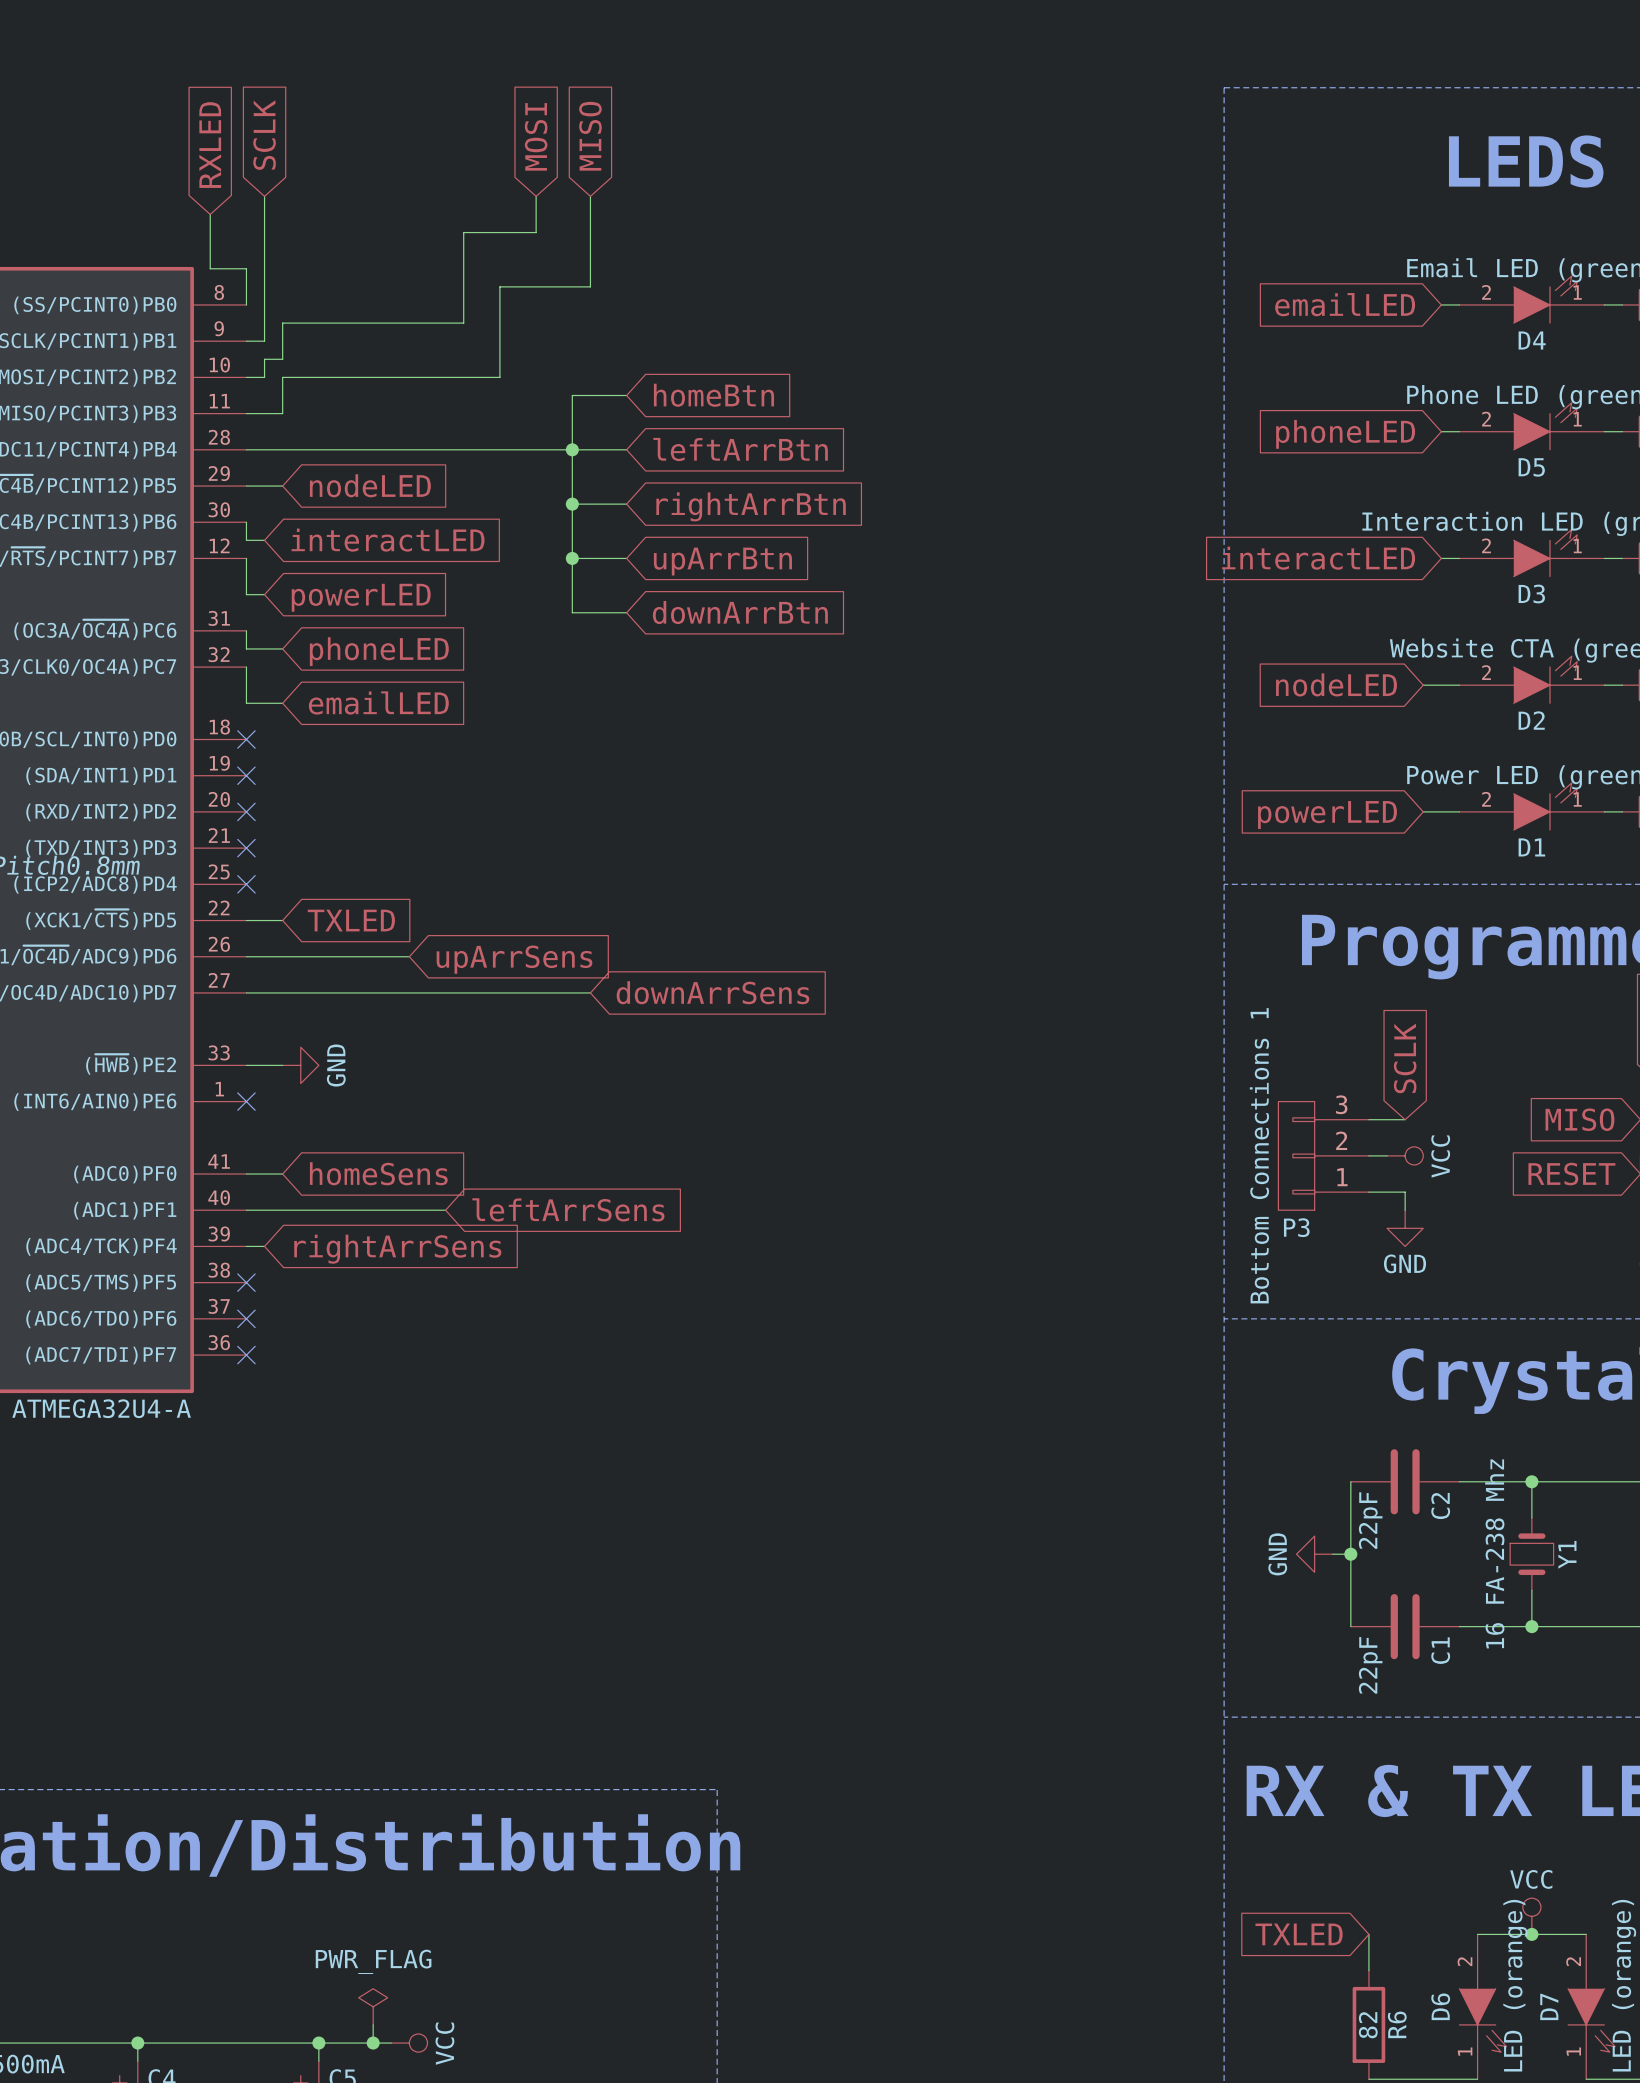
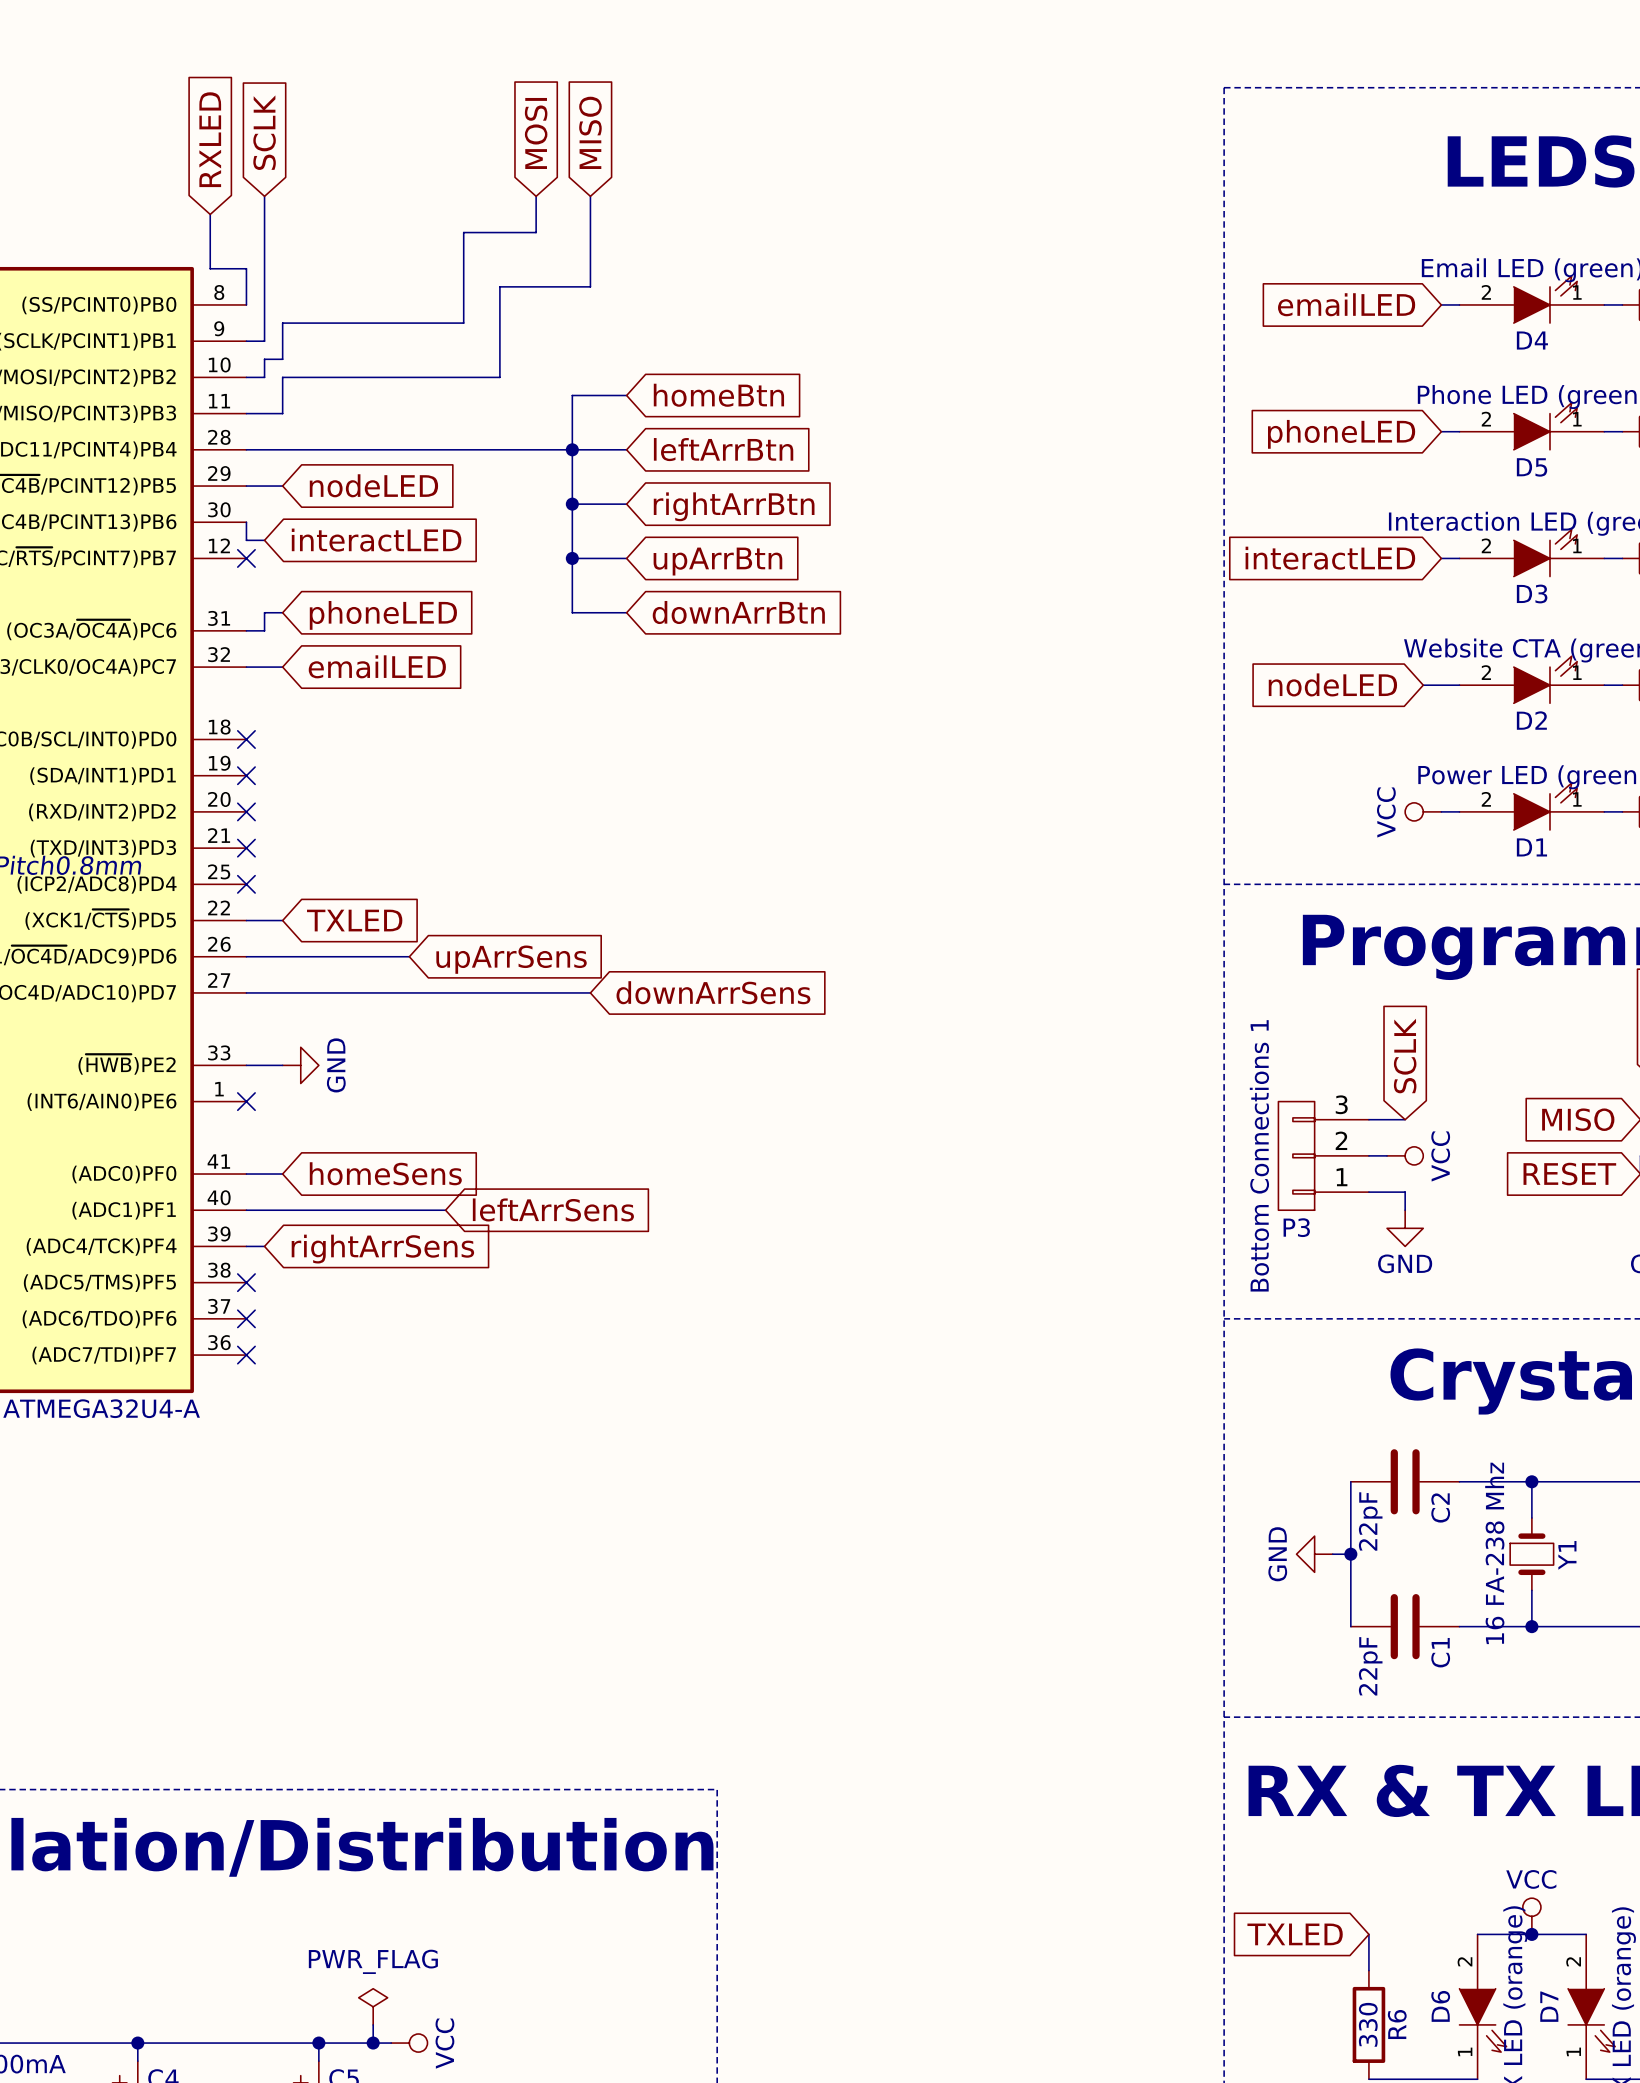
wire: (246, 558) (246, 594) (264, 594) -> none
no-connect mark: none -> (246, 558)
global label: powerLED (361, 597) -> none
wire: (246, 630) (246, 648) (282, 648) -> (246, 630) (264, 630) (264, 612) (282, 612)
global label position: phoneLED (379, 651) -> phoneLED (383, 615)
wire: (246, 667) (246, 703) (282, 703) -> (246, 667) (282, 667)
global label position: emailLED (378, 702) -> emailLED (377, 666)
power symbol: none -> VCC (1423, 811)
global label: powerLED (1327, 815) -> none
R6 value: 82 (1368, 2025) -> 330 (1368, 2024)

